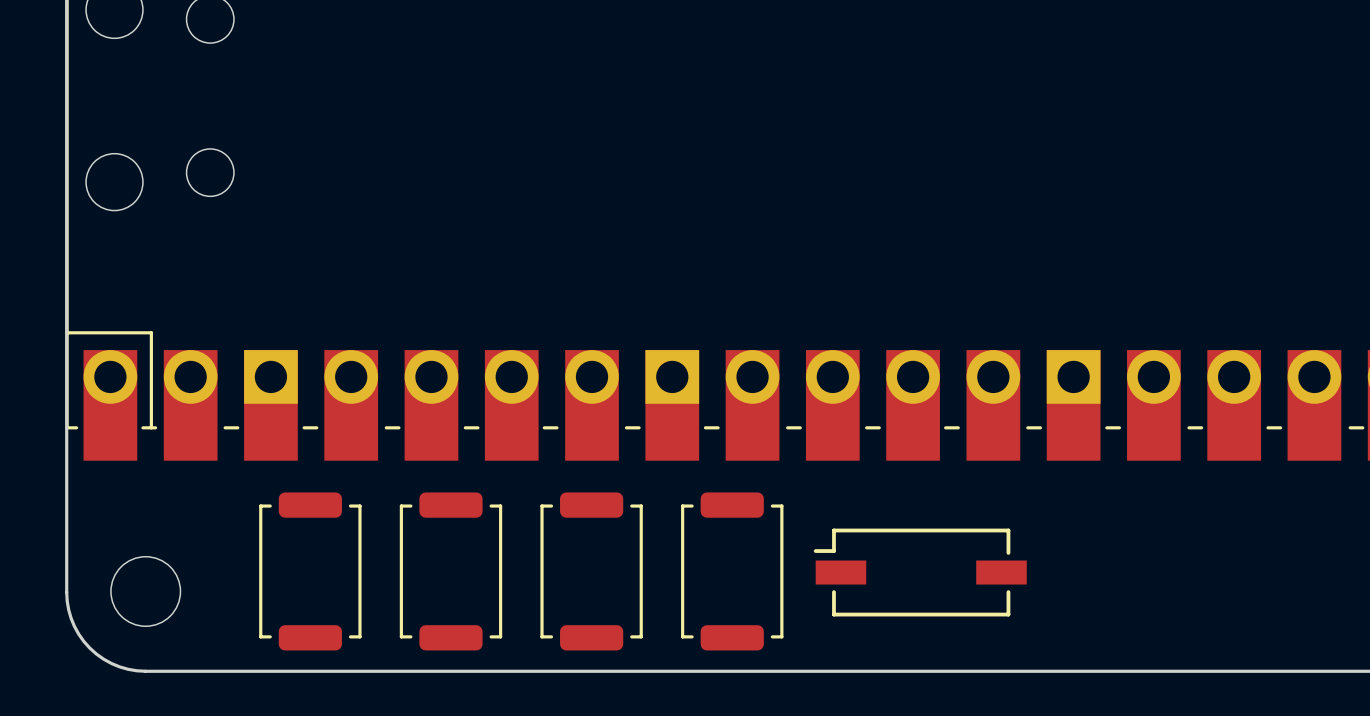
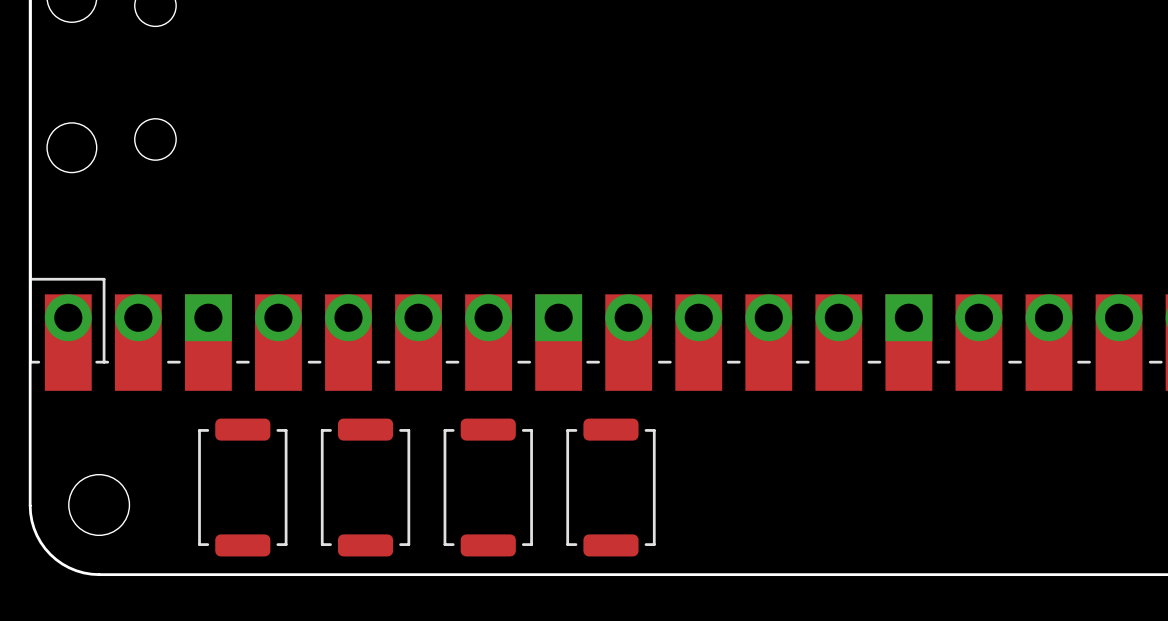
part: (920, 572) -> none

